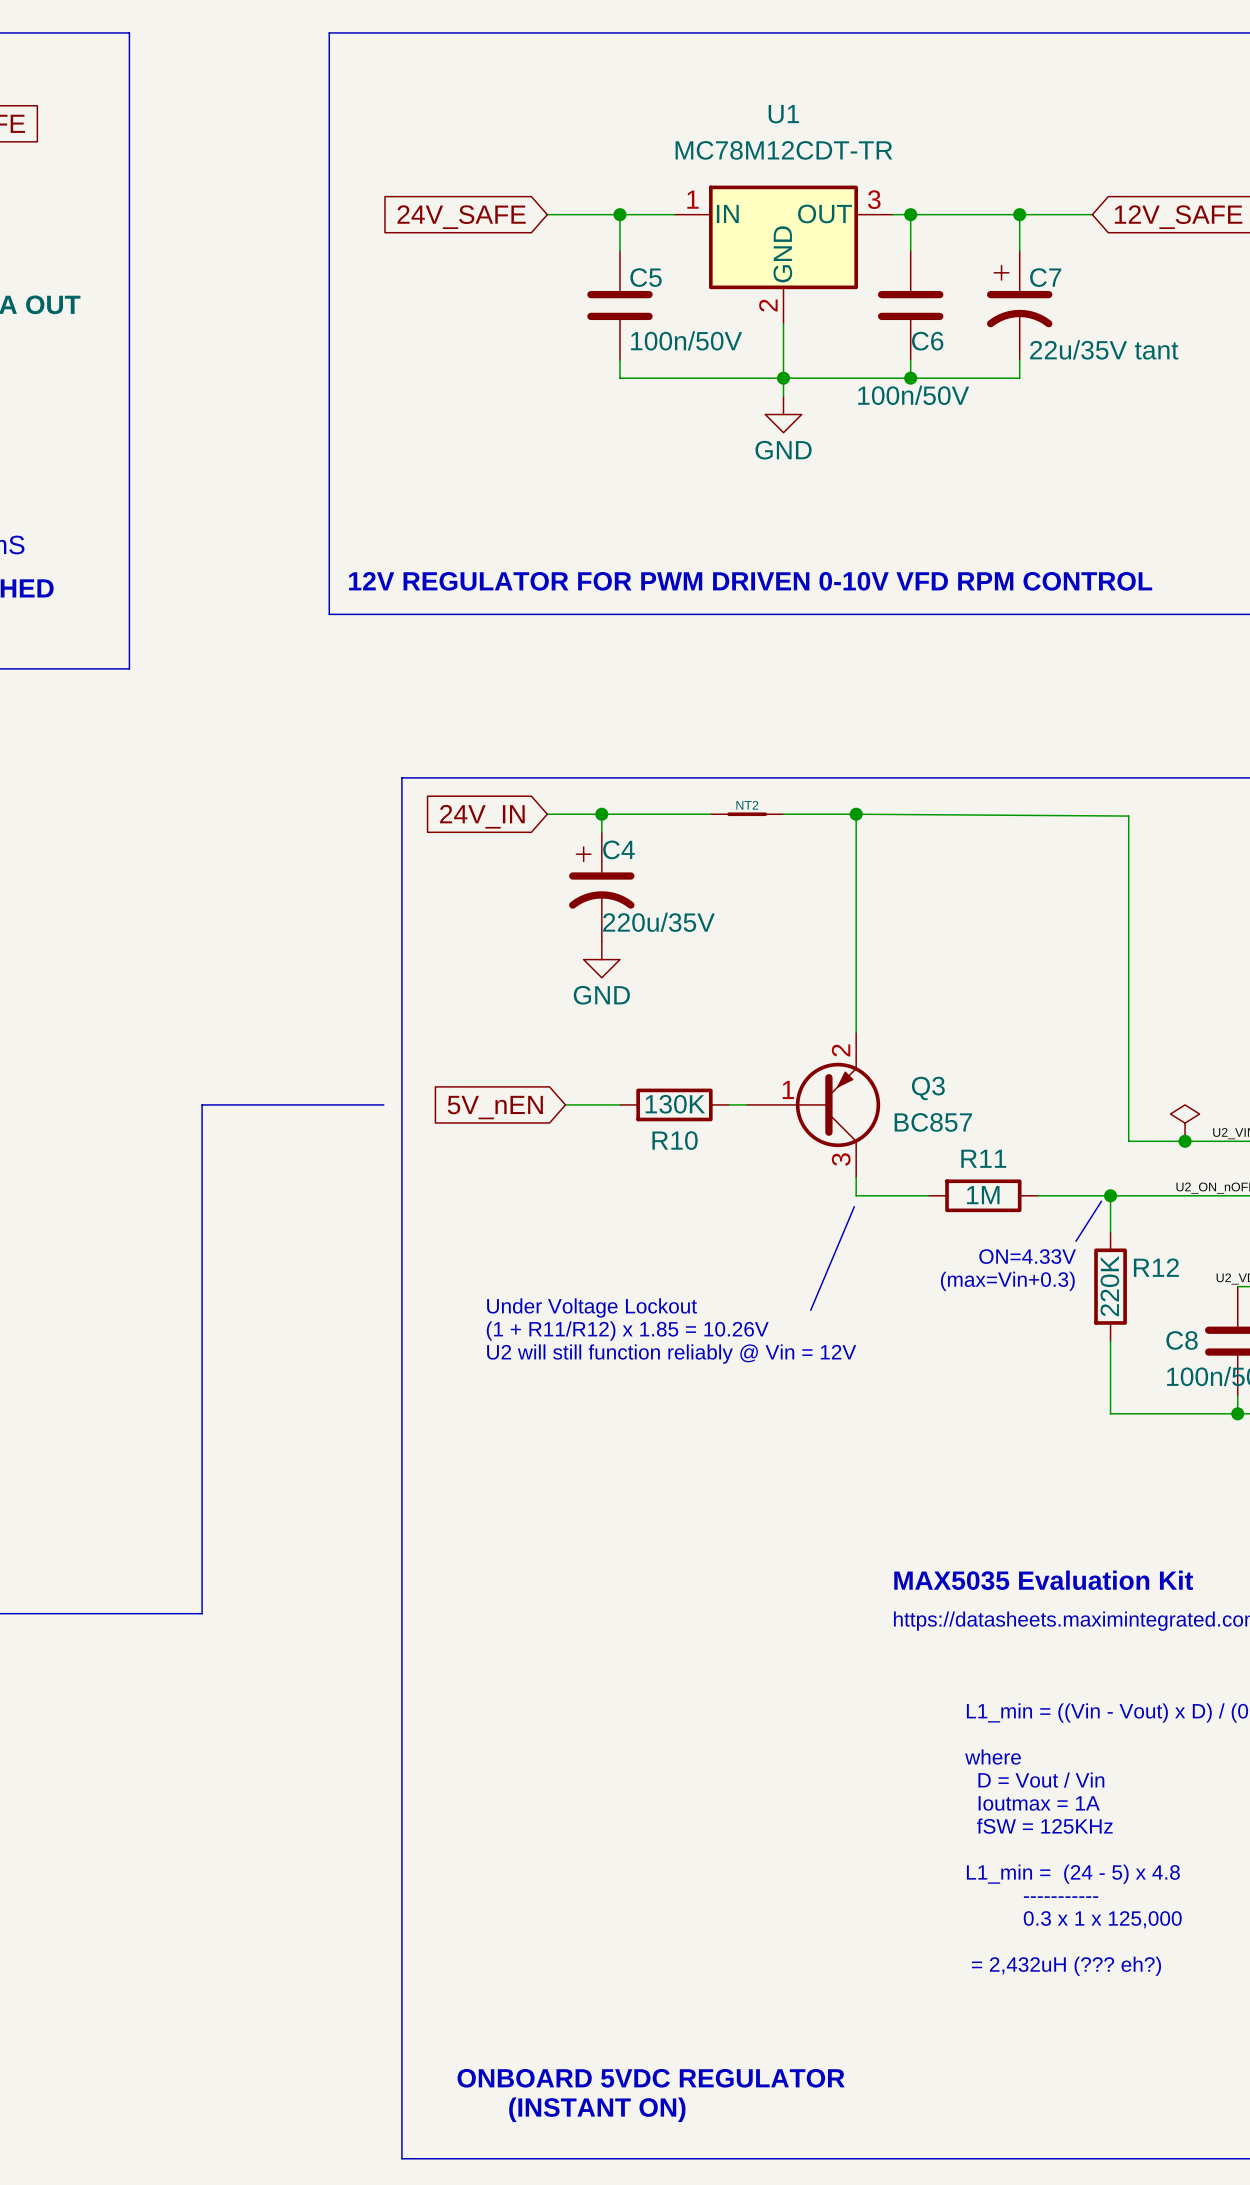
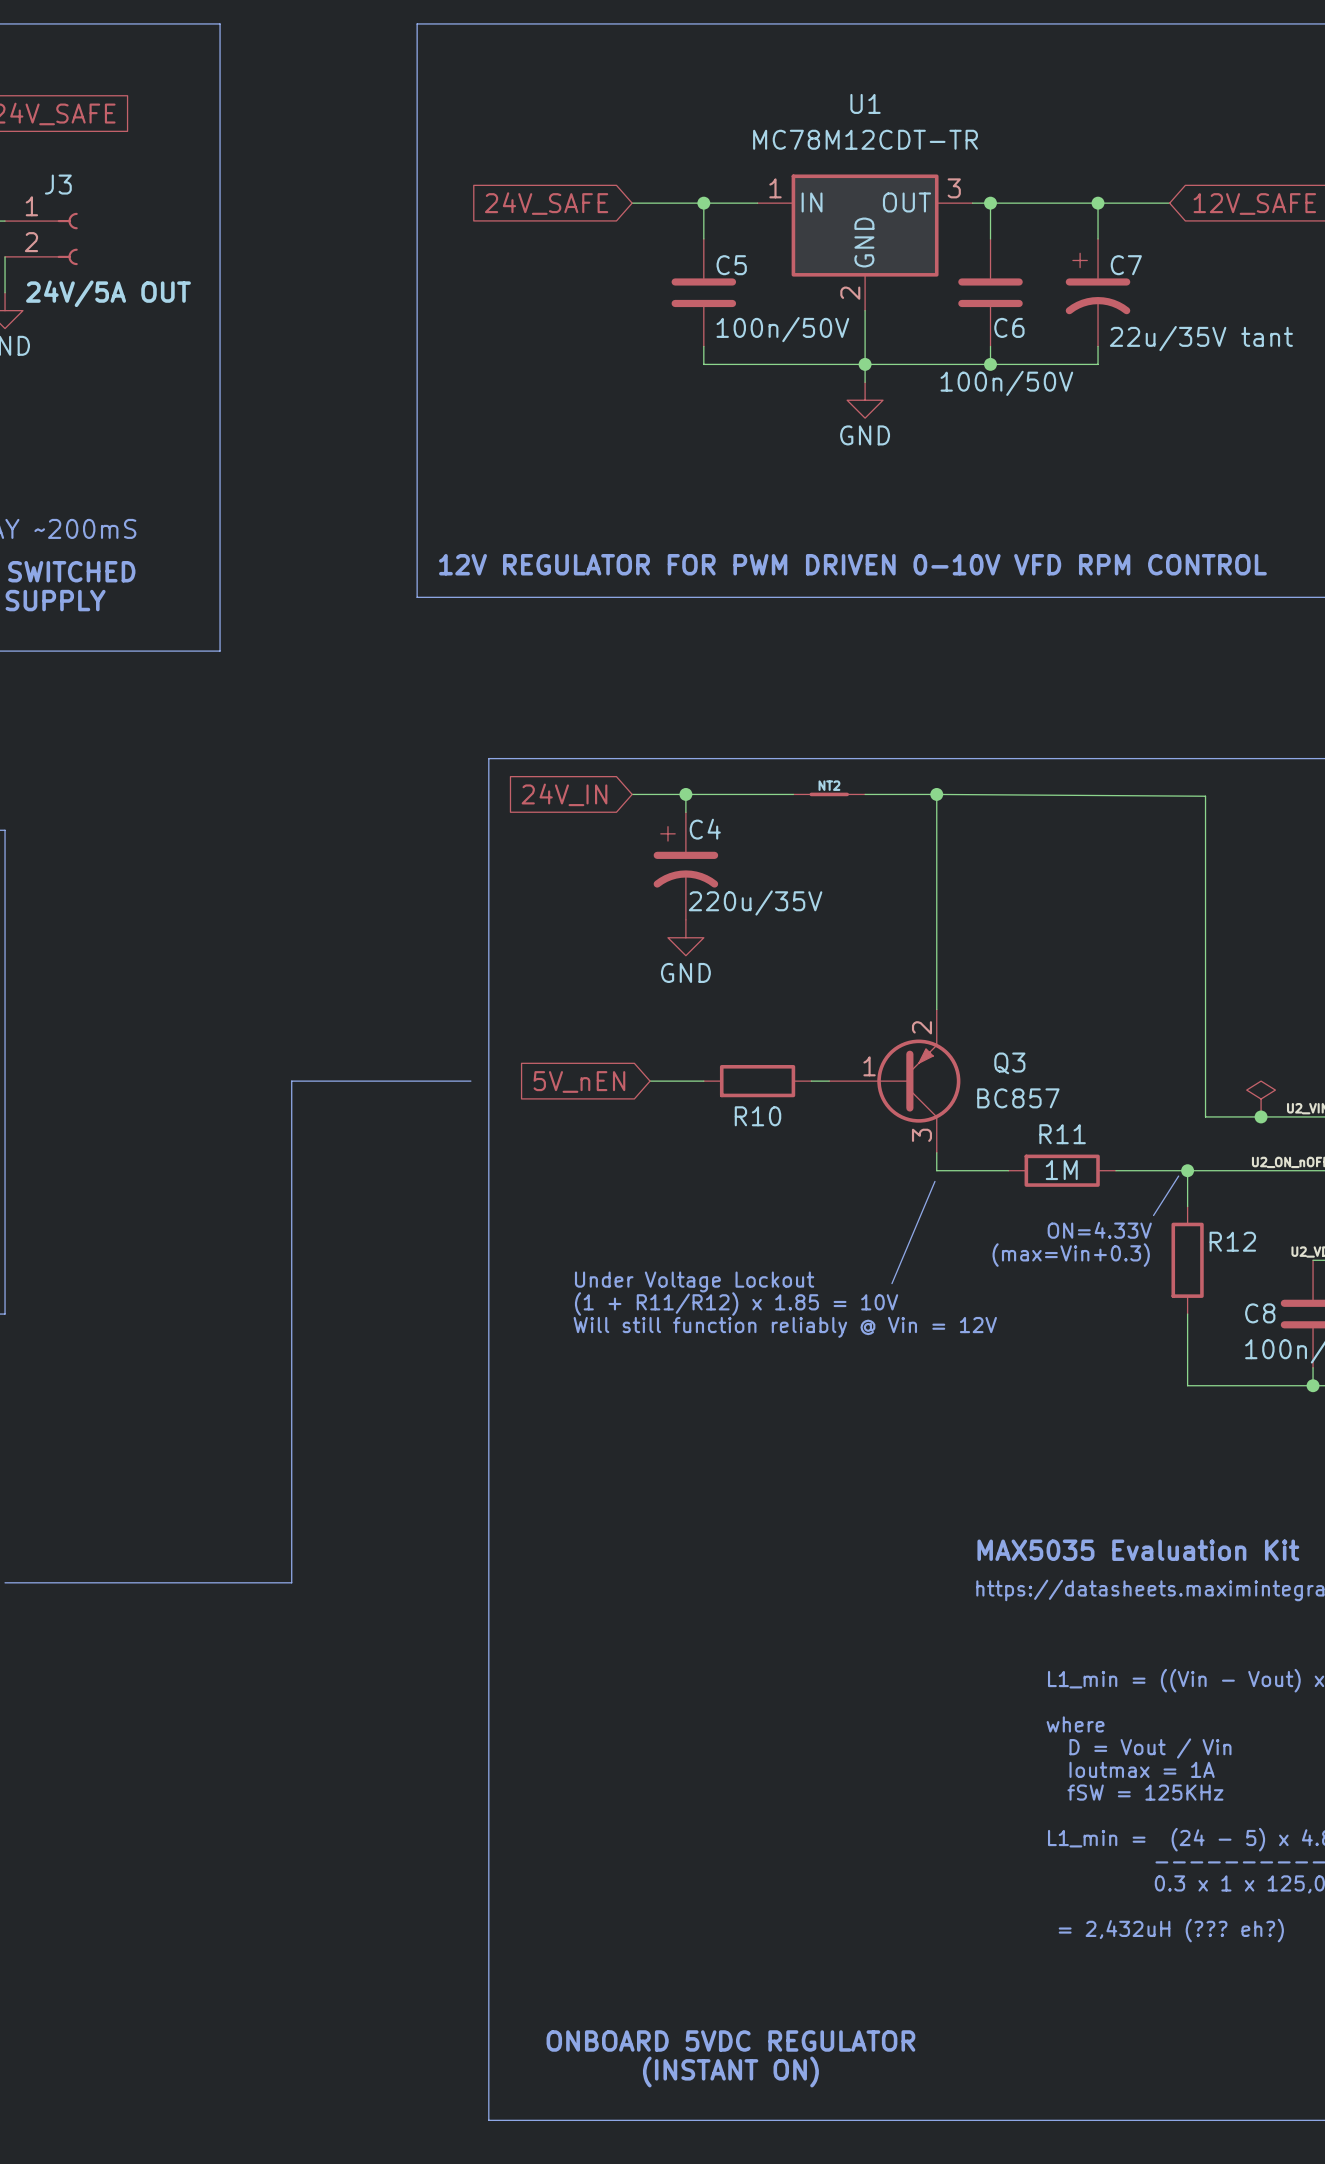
R10 value: 130K (675, 1104) -> none
R12 value: 220K (1109, 1286) -> none
text: (1 + R11/R12) x 1.85 = 10.26V (627, 1331) -> (1 + R11/R12) x 1.85 = 10V (736, 1304)
text: U2 will still function reliably @ Vin = 12V (671, 1354) -> Will still function reliably @ Vin = 12V (785, 1327)

